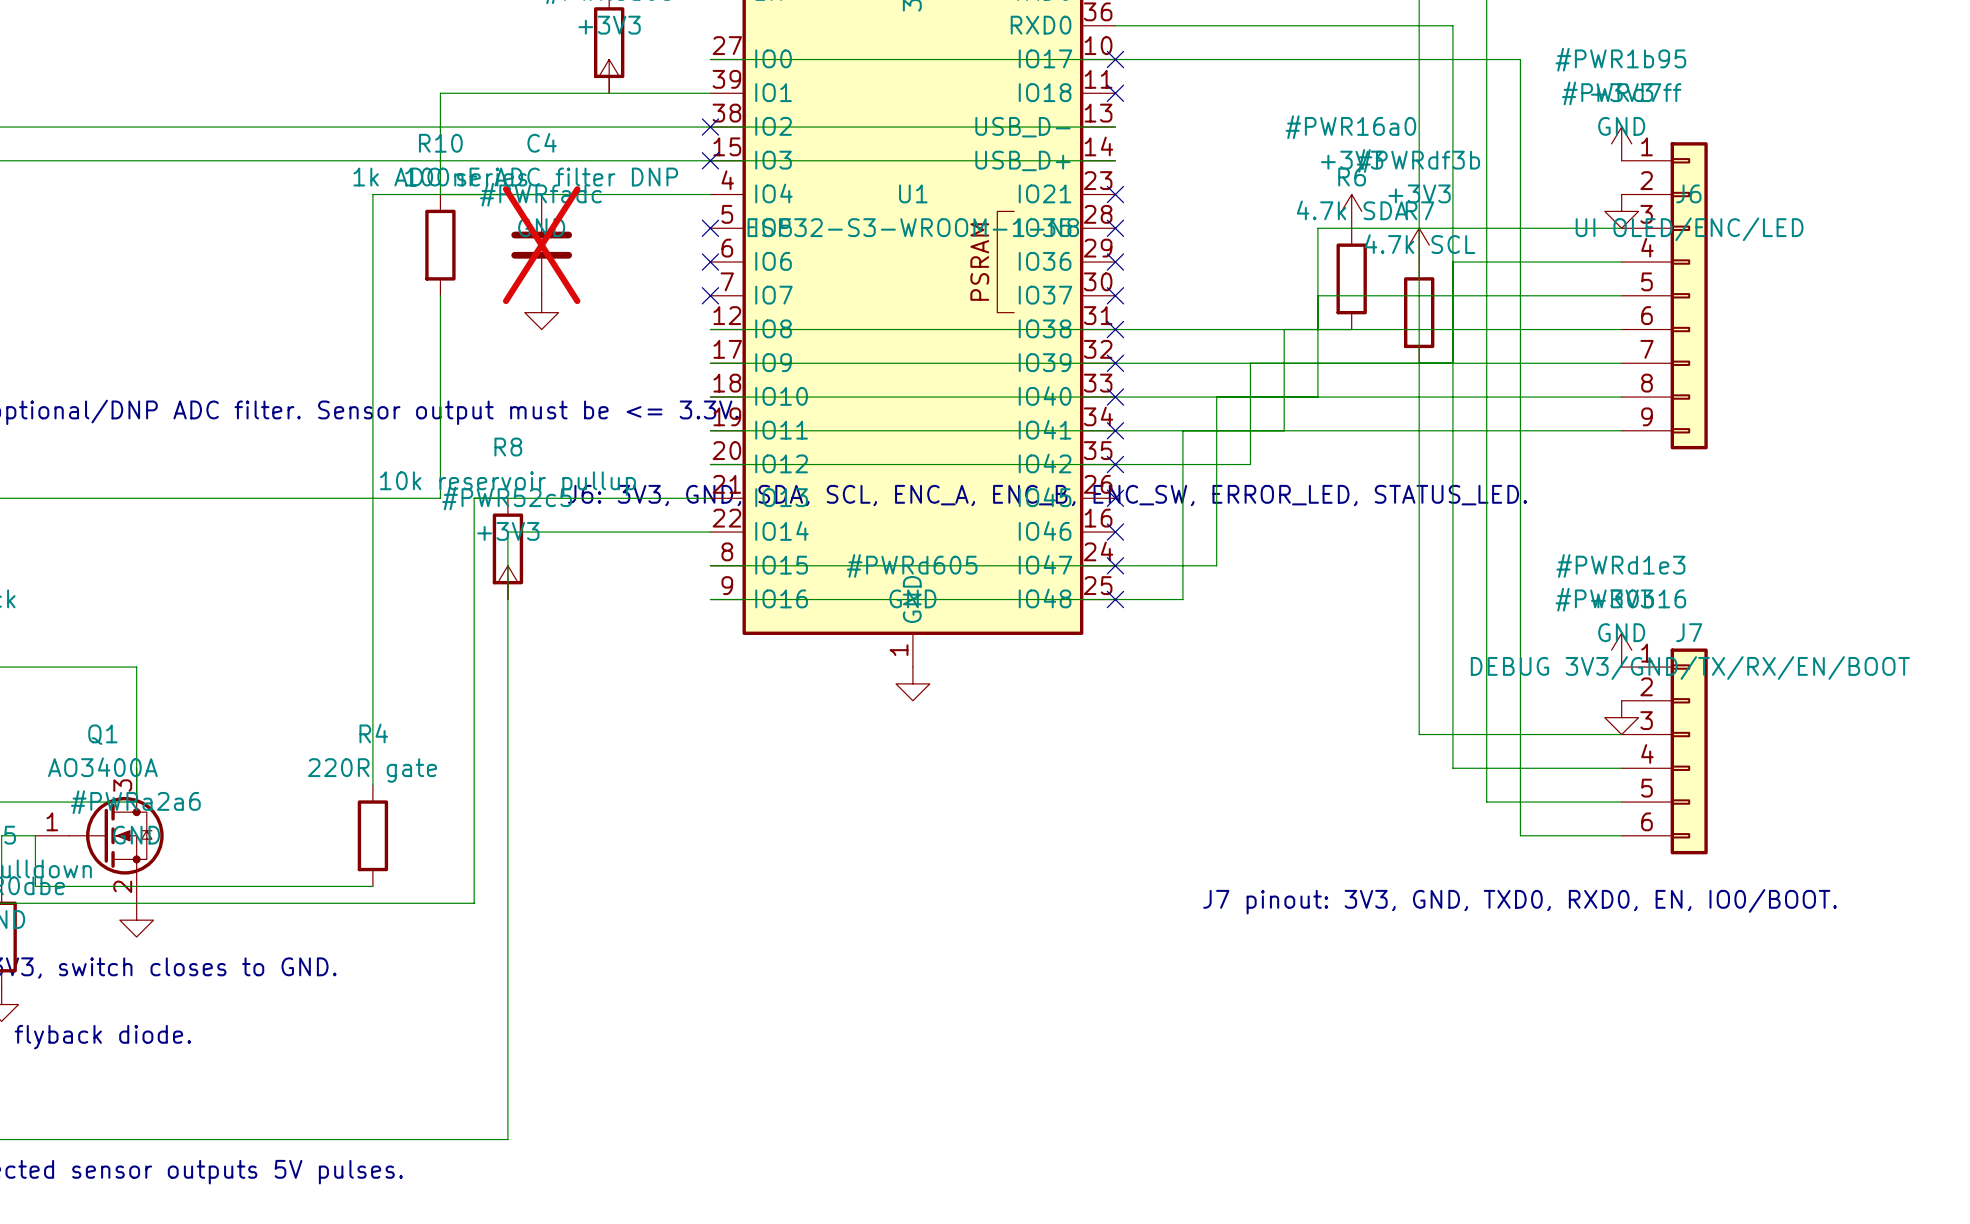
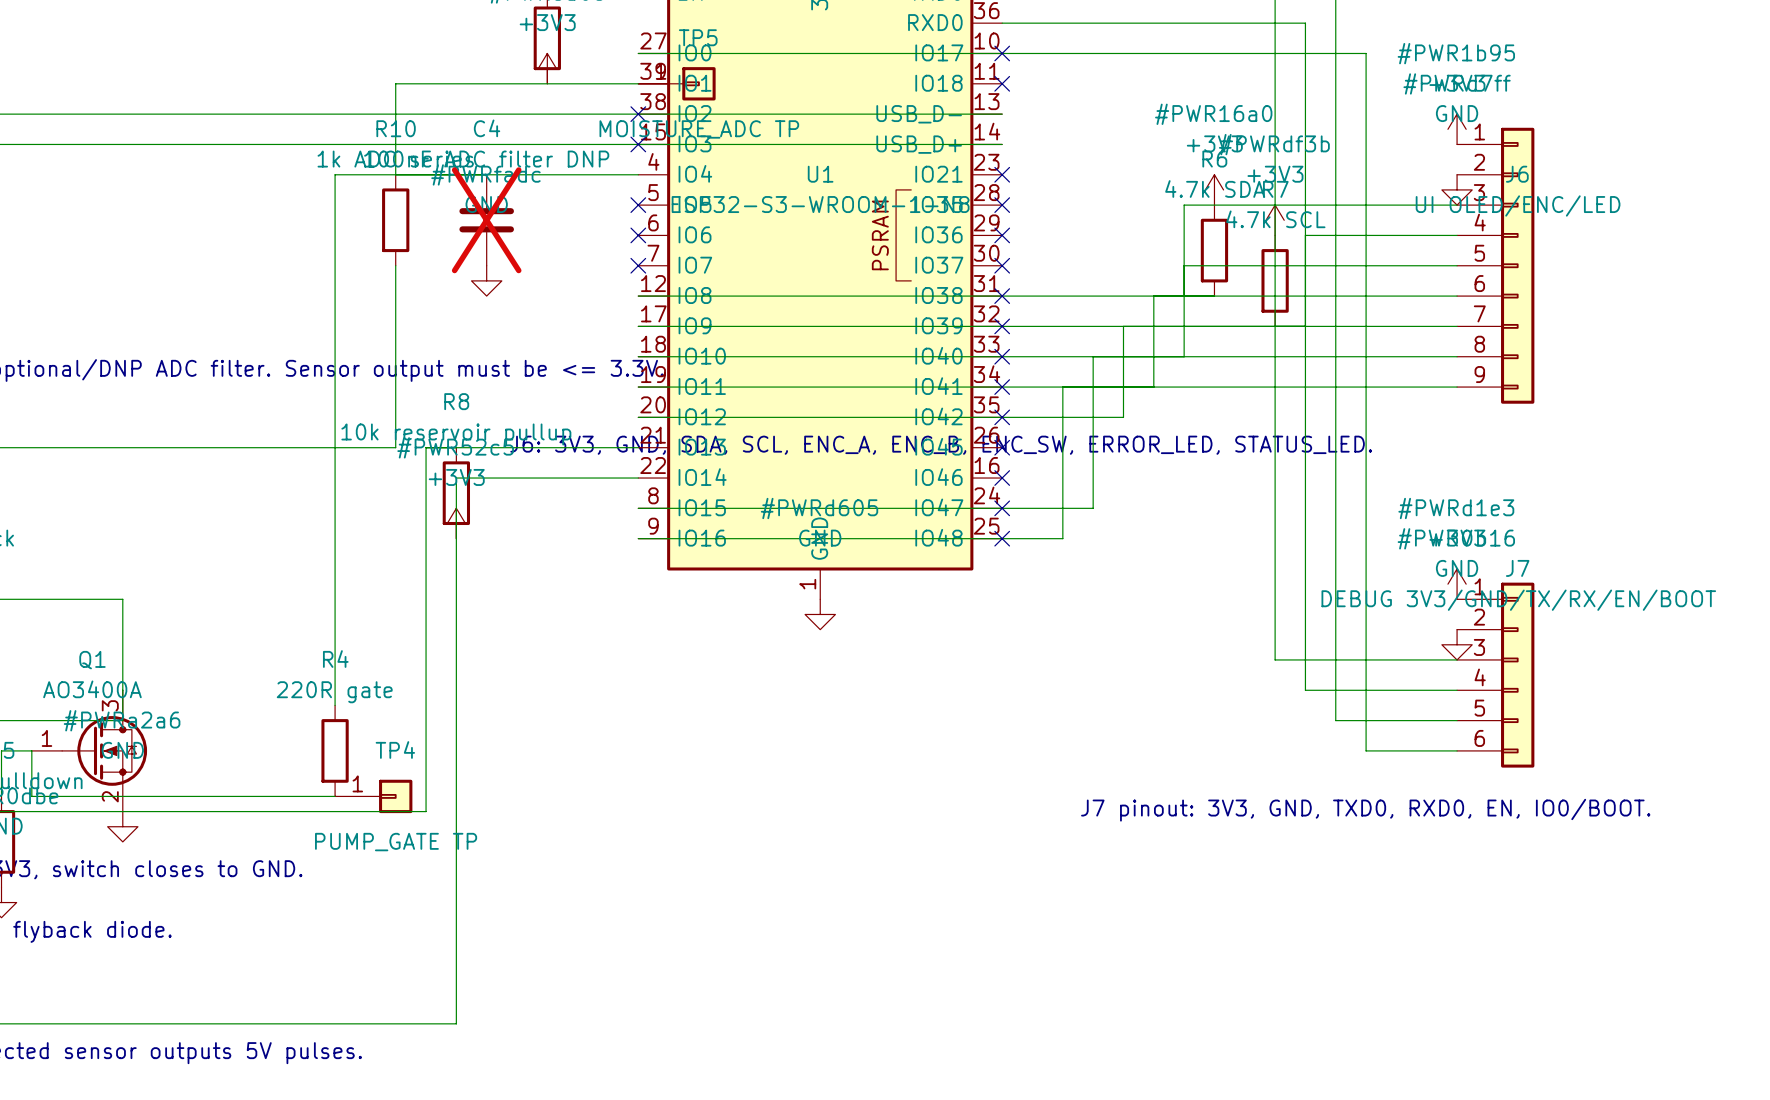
TP5: none -> MOISTURE_ADC TP (676, 83)
TP4: none -> PUMP_GATE TP (373, 796)

